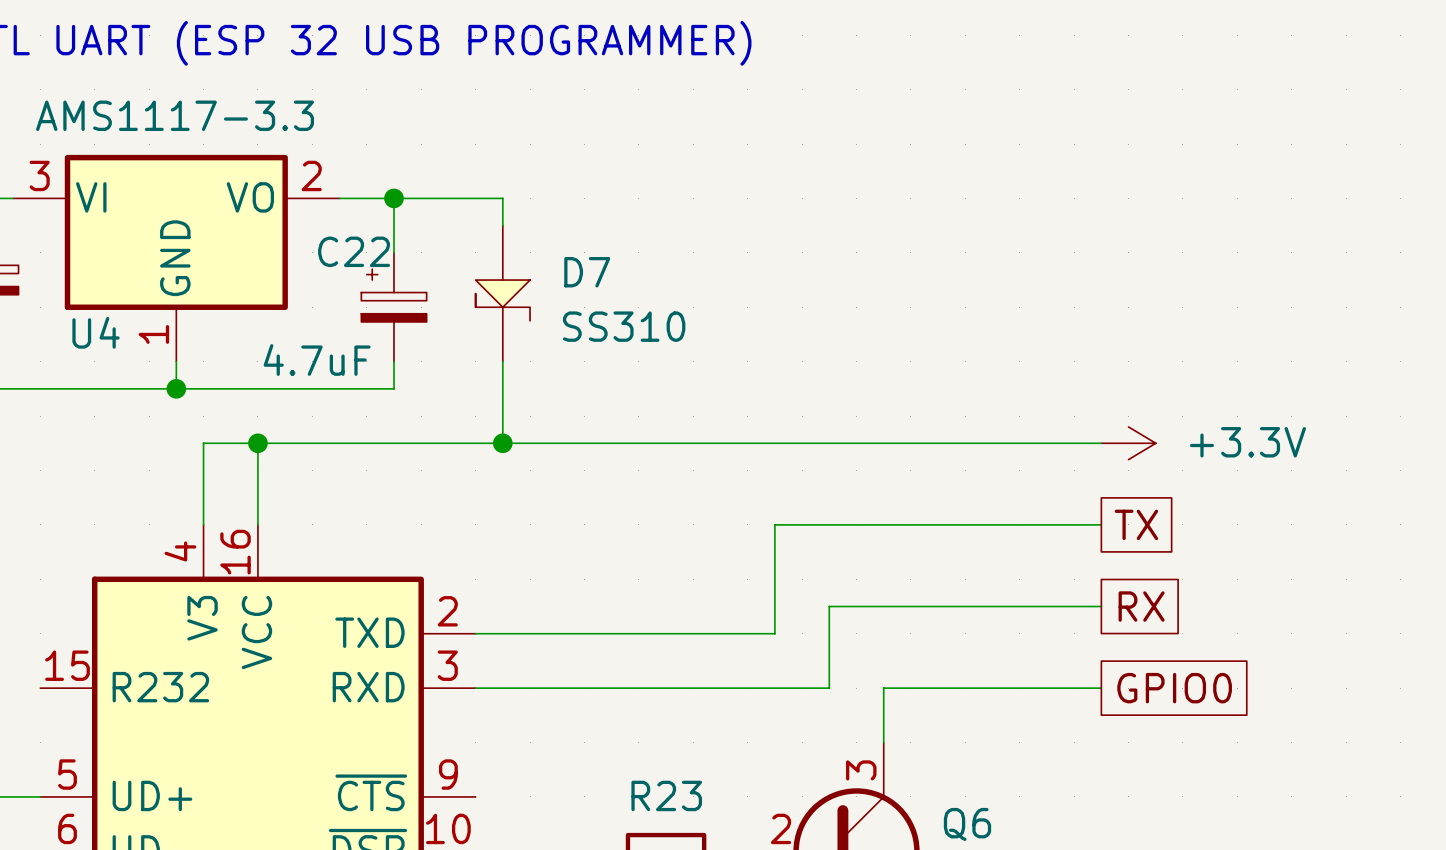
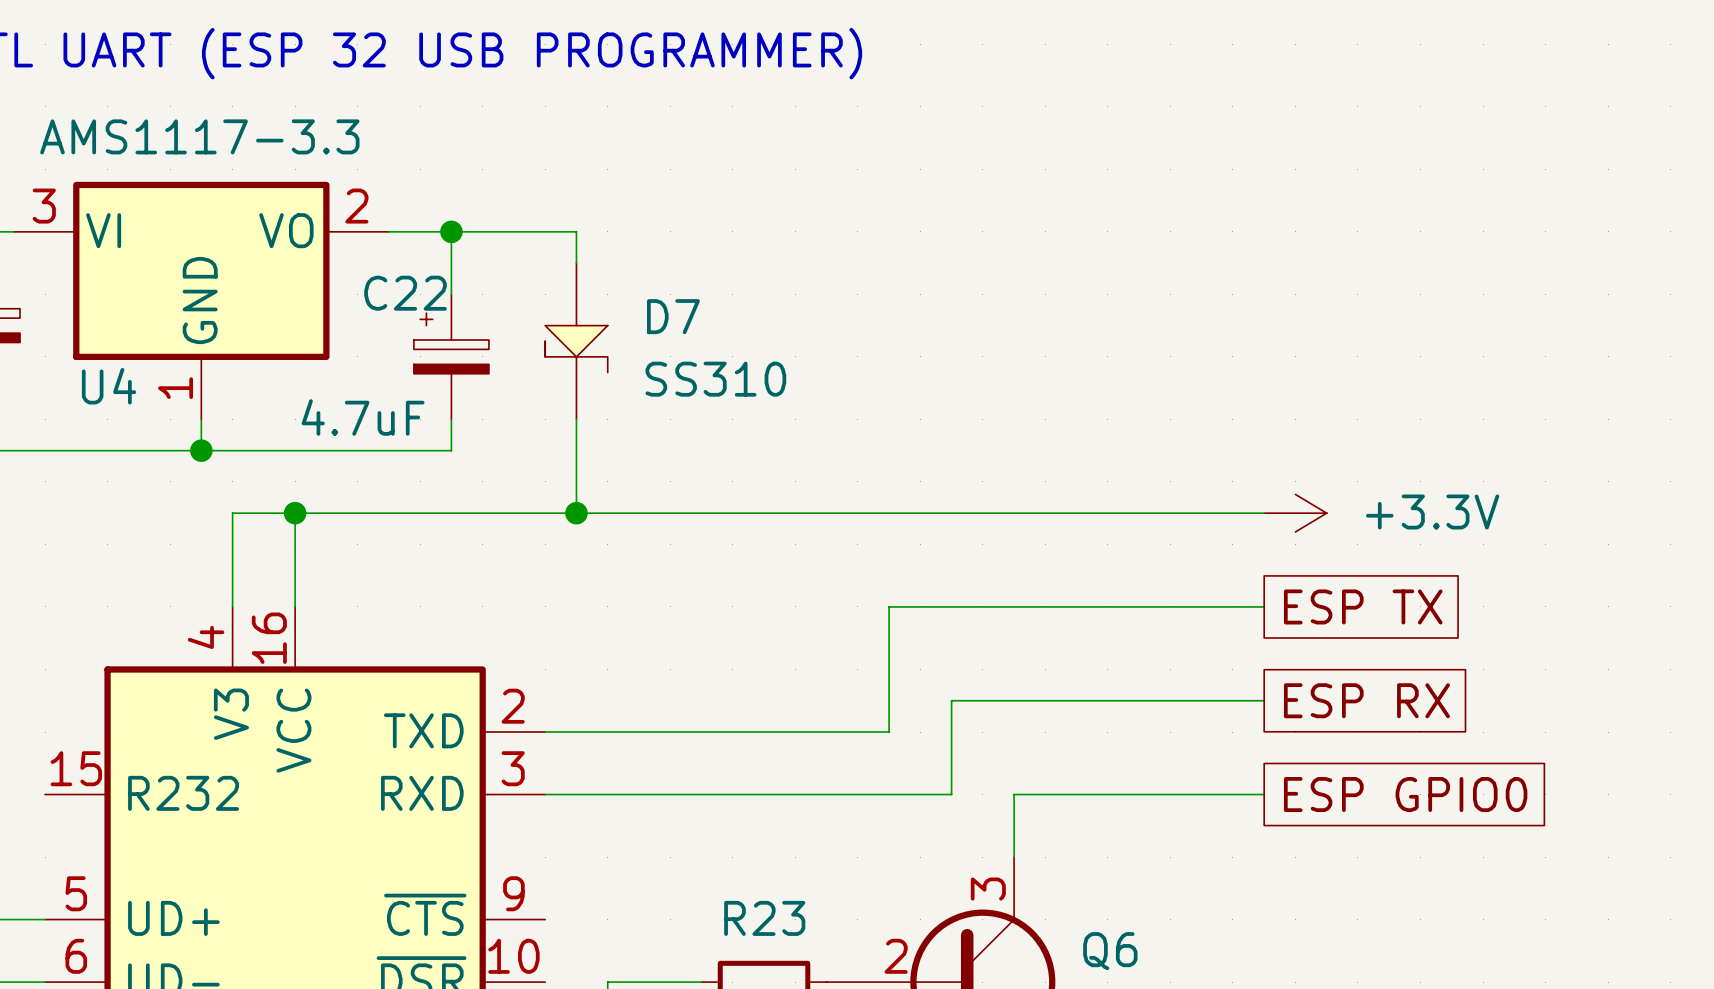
global label: TX (1136, 524) -> ESP TX (1363, 606)
global label: RX (1141, 606) -> ESP RX (1366, 700)
global label: GPIO0 (1174, 688) -> ESP GPIO0 (1405, 794)

